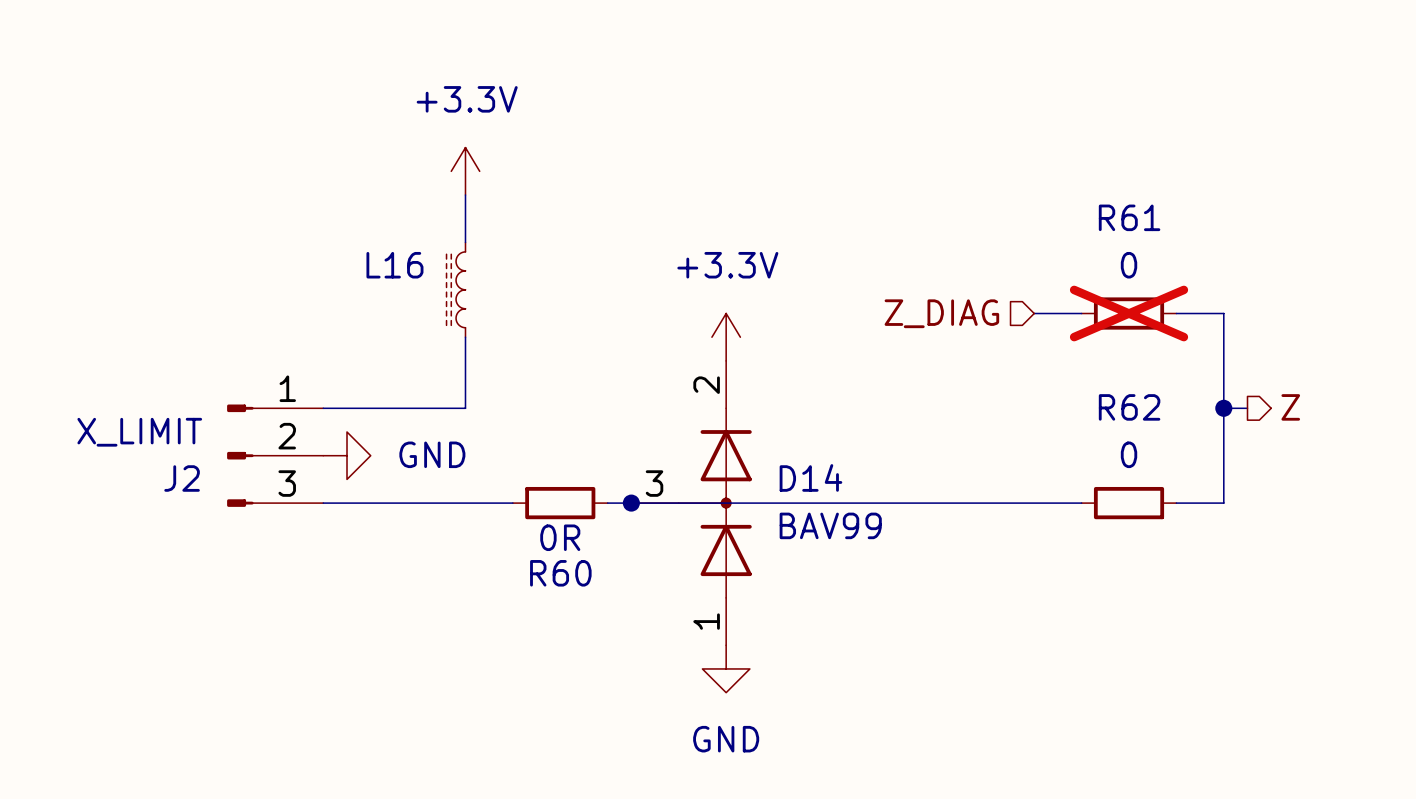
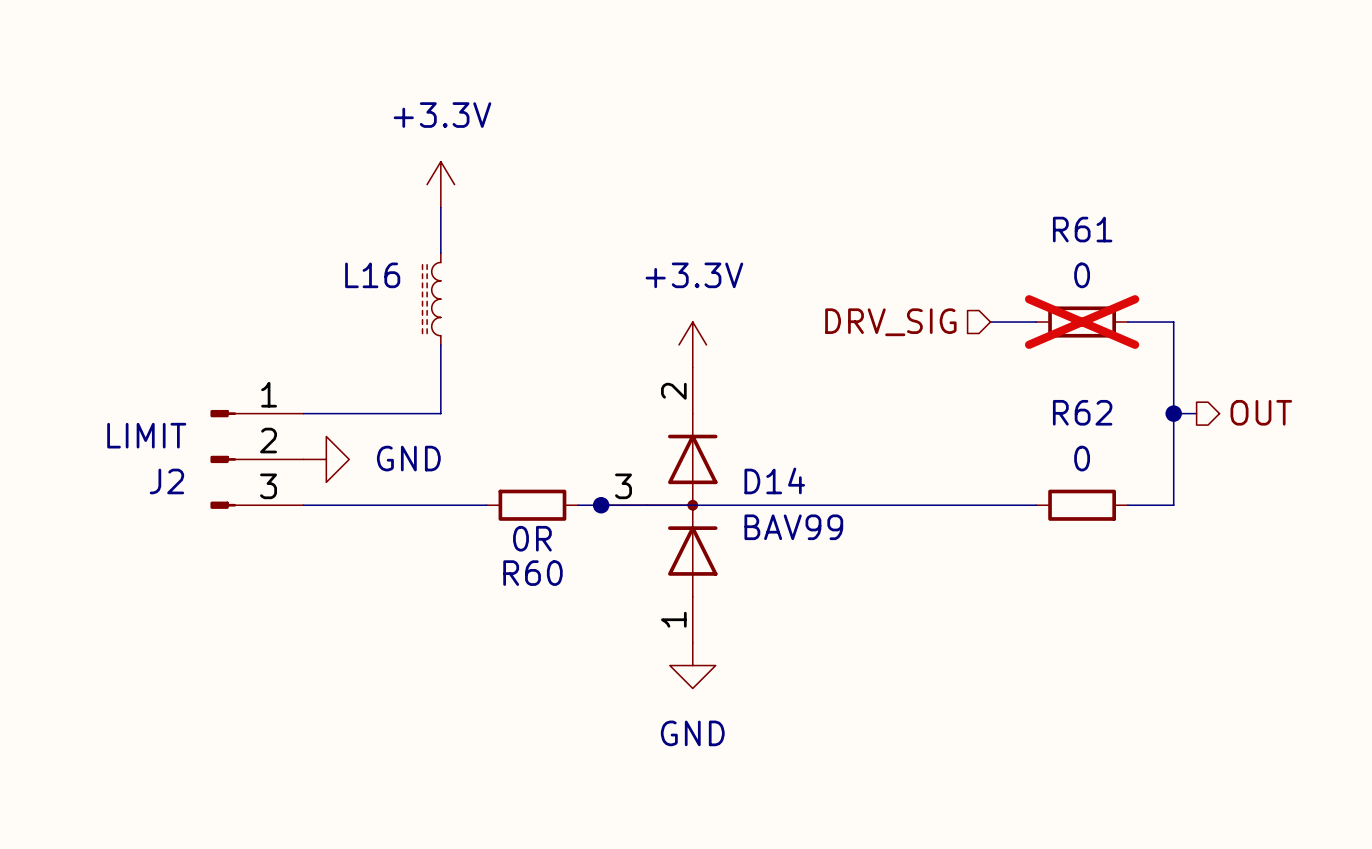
hierarchical label: Z_DIAG (941, 313) -> DRV_SIG (890, 322)
hierarchical label: Z (1290, 407) -> OUT (1261, 412)
J2 value: X_LIMIT (139, 432) -> LIMIT (146, 435)

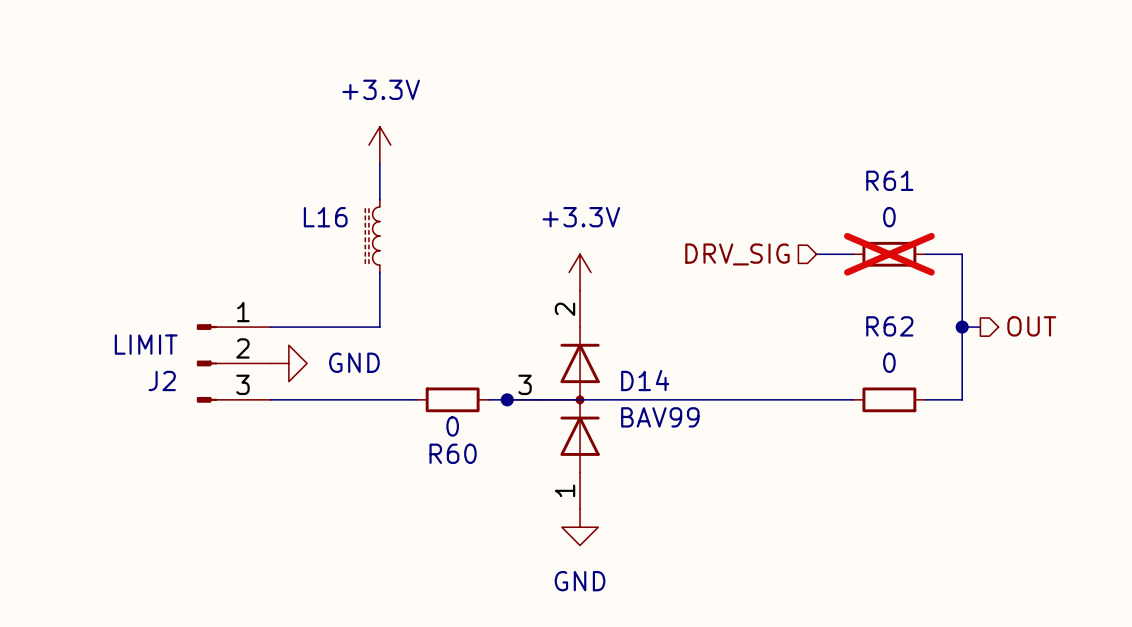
R60 value: 0R (532, 538) -> 0 (452, 426)

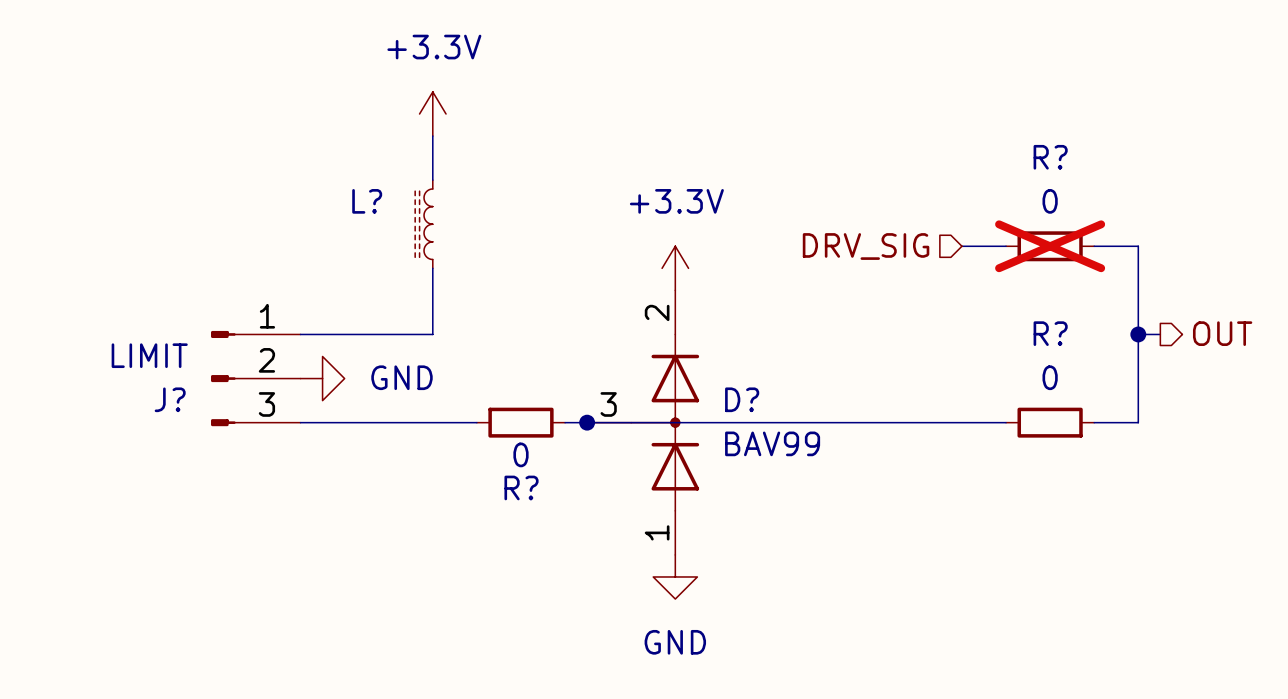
R61 name: R61 (889, 180) -> R? (1050, 157)
L16 name: L16 (325, 217) -> L? (367, 201)
R62 name: R62 (889, 326) -> R? (1050, 333)
J2 name: J2 (162, 380) -> J? (170, 399)
D14 name: D14 (645, 380) -> D? (742, 399)
R60 name: R60 (453, 453) -> R? (521, 487)

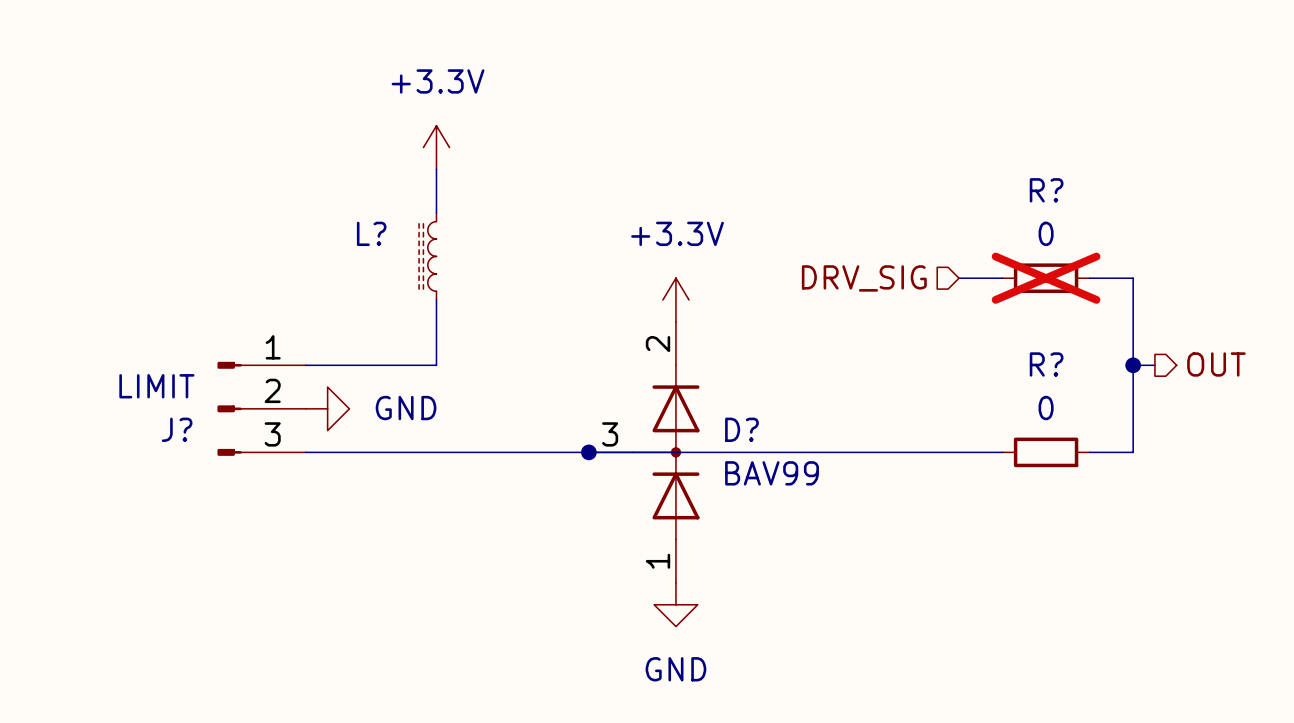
wire: none -> (480, 452) (567, 452)
R?: 0 (520, 422) -> none

